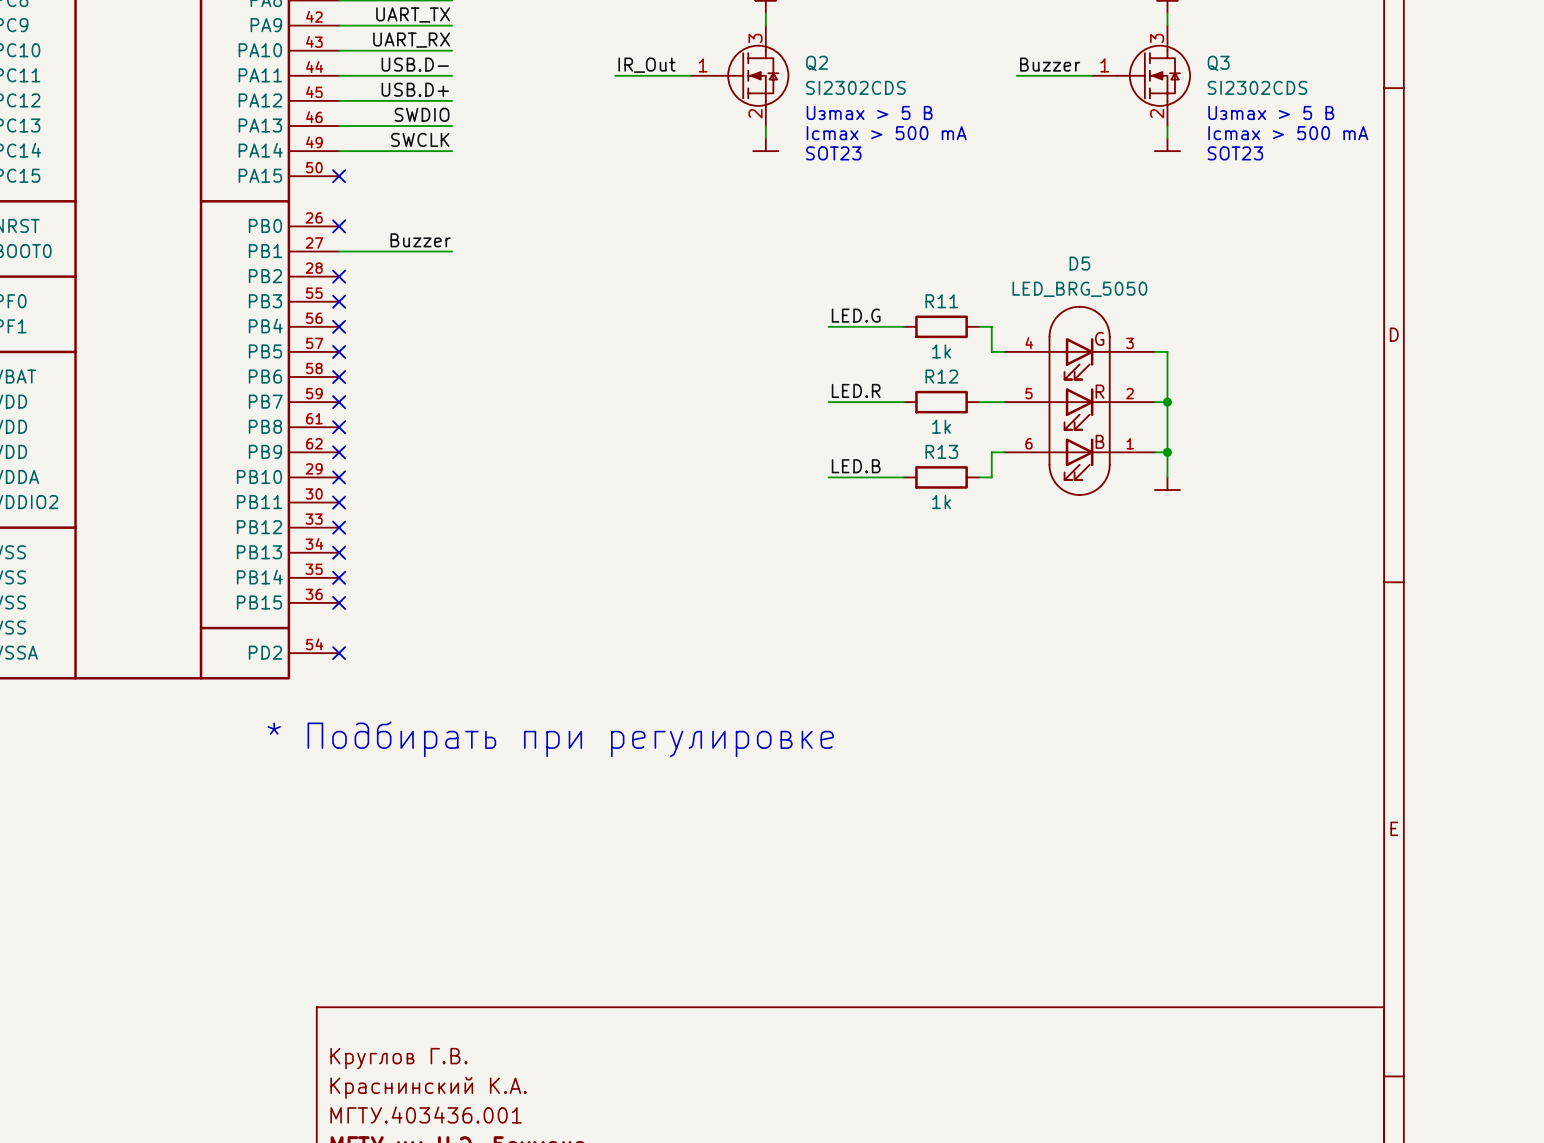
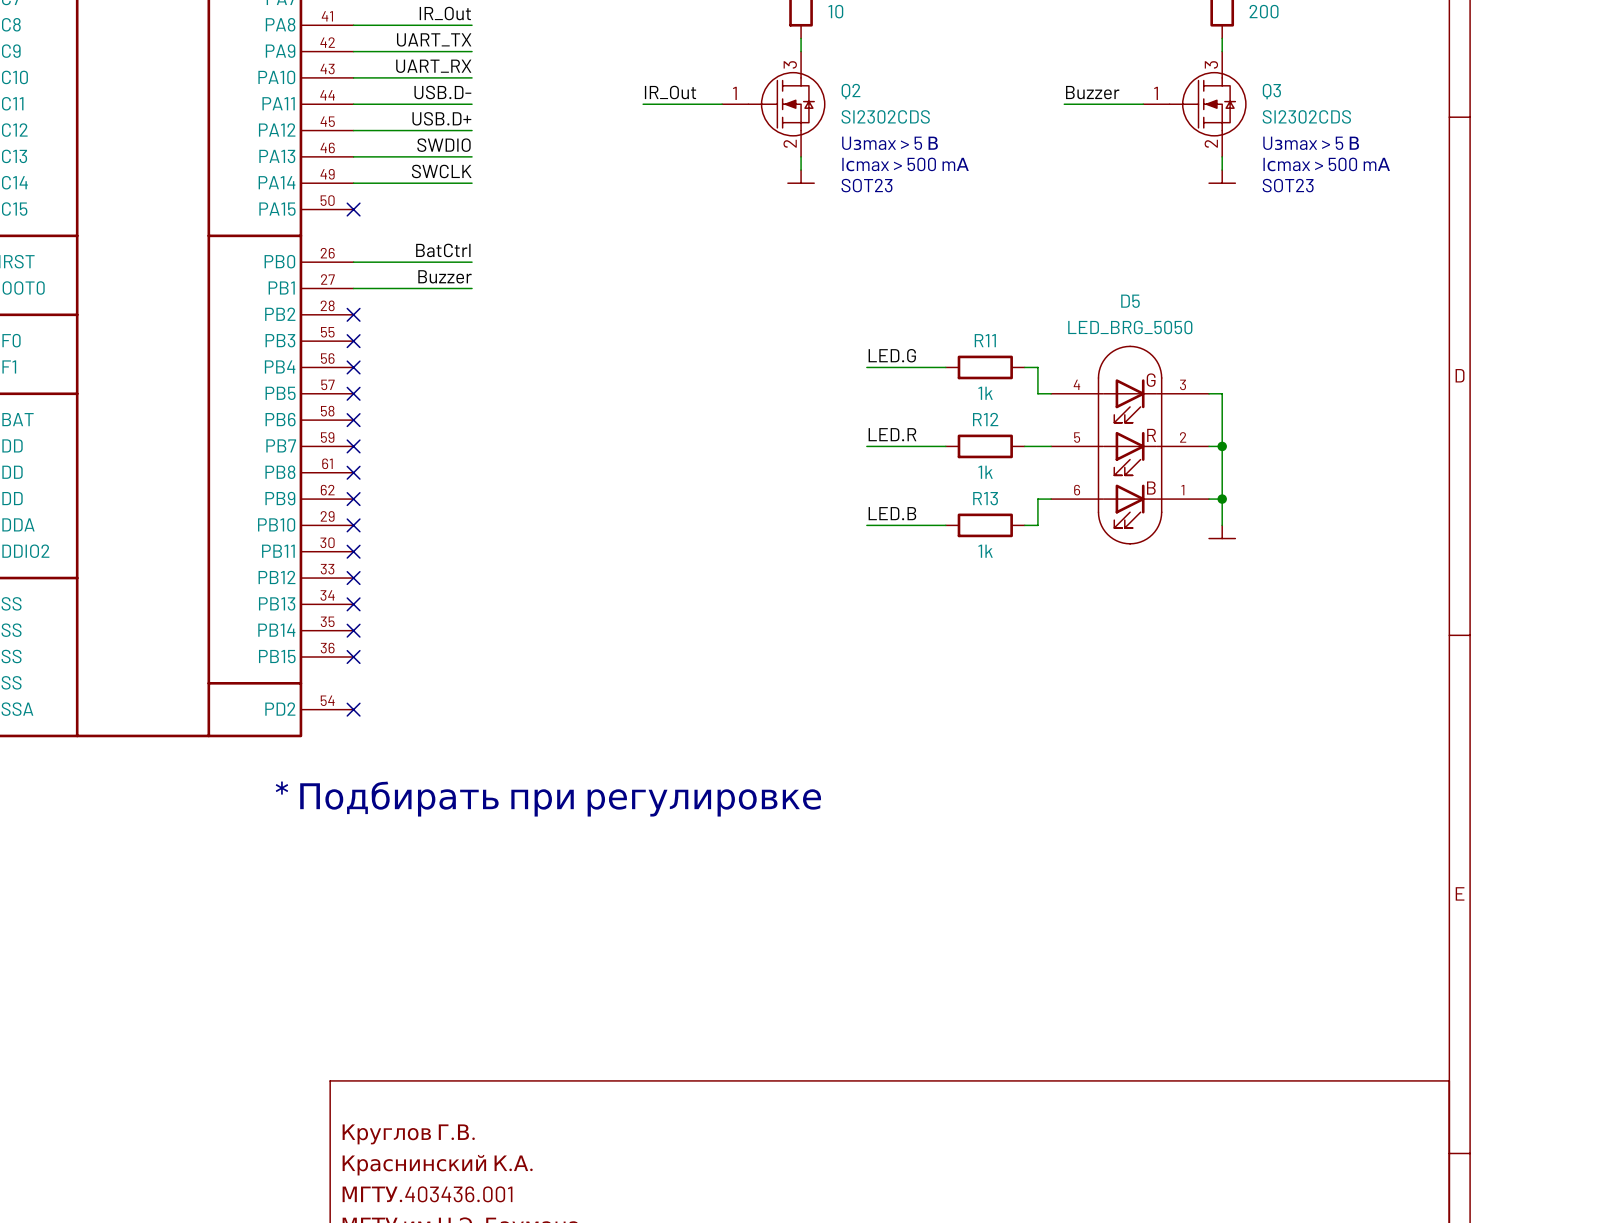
label: none -> BatCtrl (443, 250)
wire: none -> (353, 262) (472, 262)
no-connect mark: (339, 226) -> none

